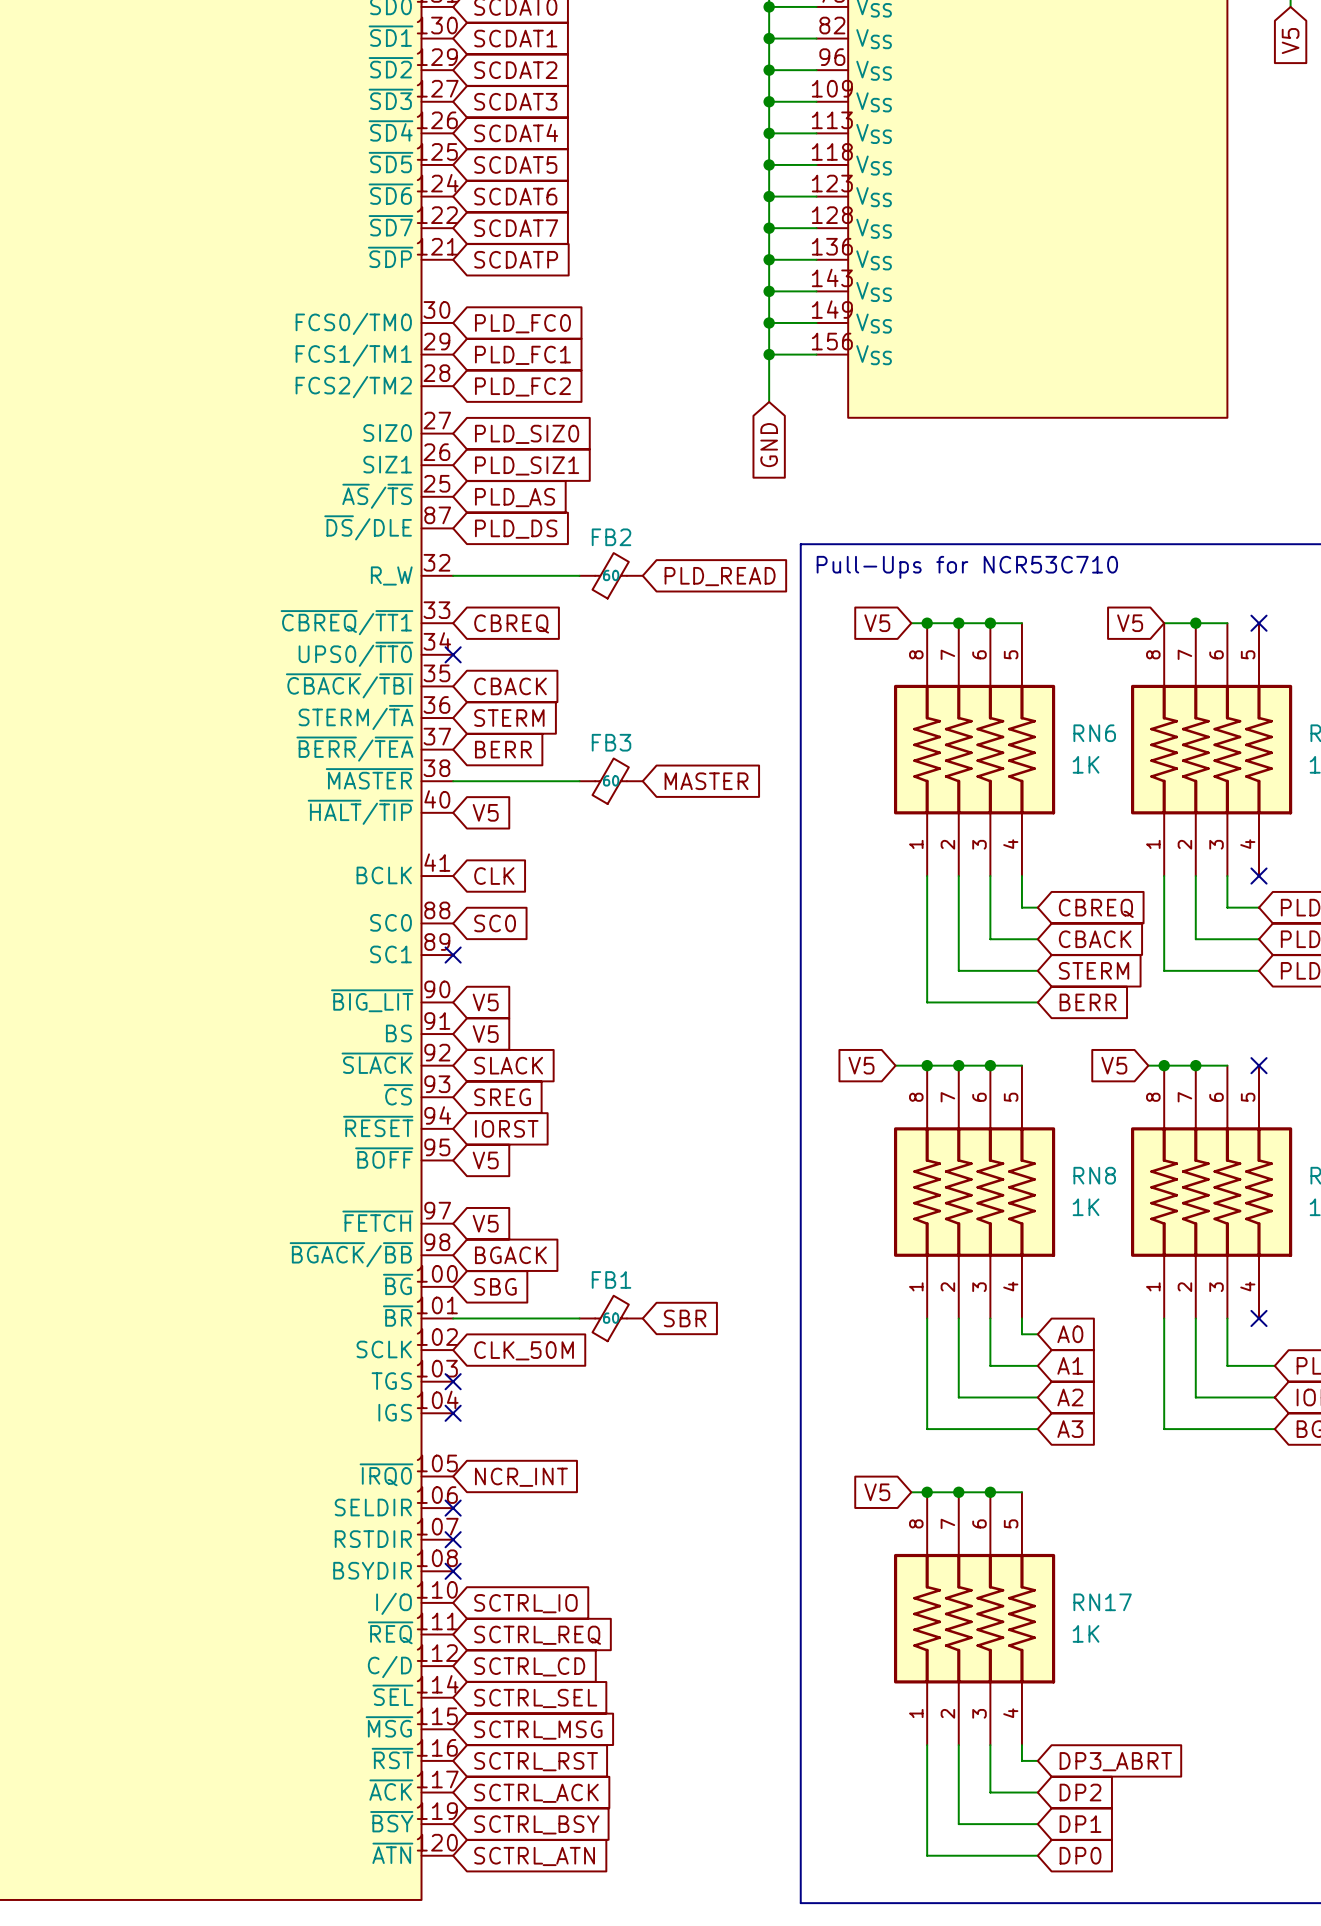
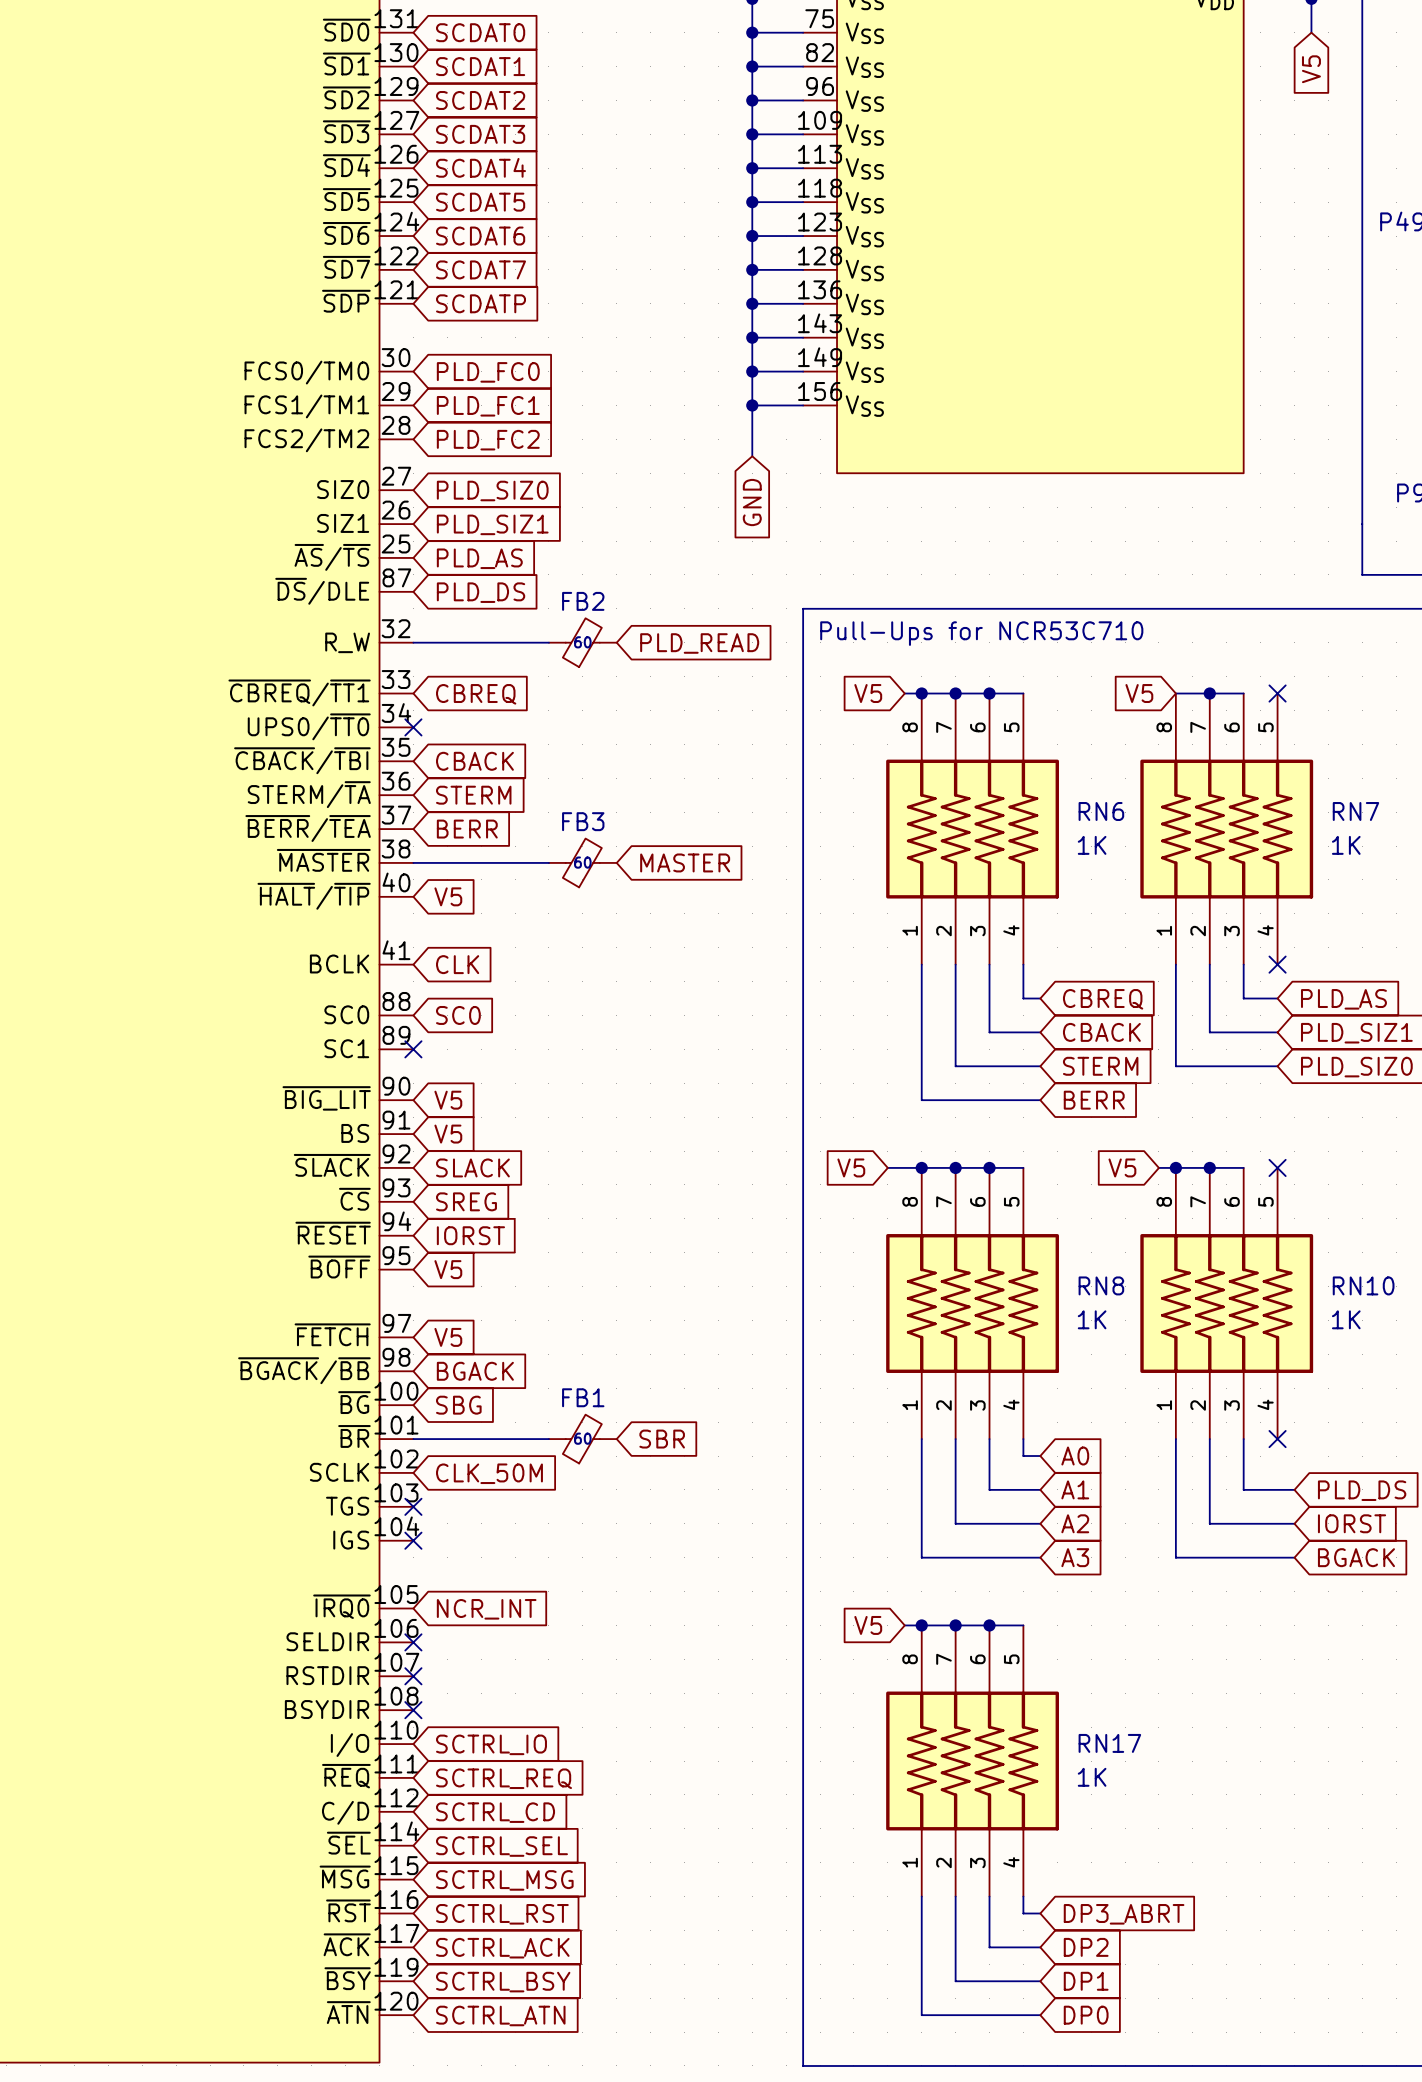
line: (816, 544) (800, 544) (800, 1903) (816, 1903) -> (803, 608) (803, 2065)
text position: Pull-Ups for NCR53C710 (967, 567) -> Pull-Ups for NCR53C710 (981, 633)

